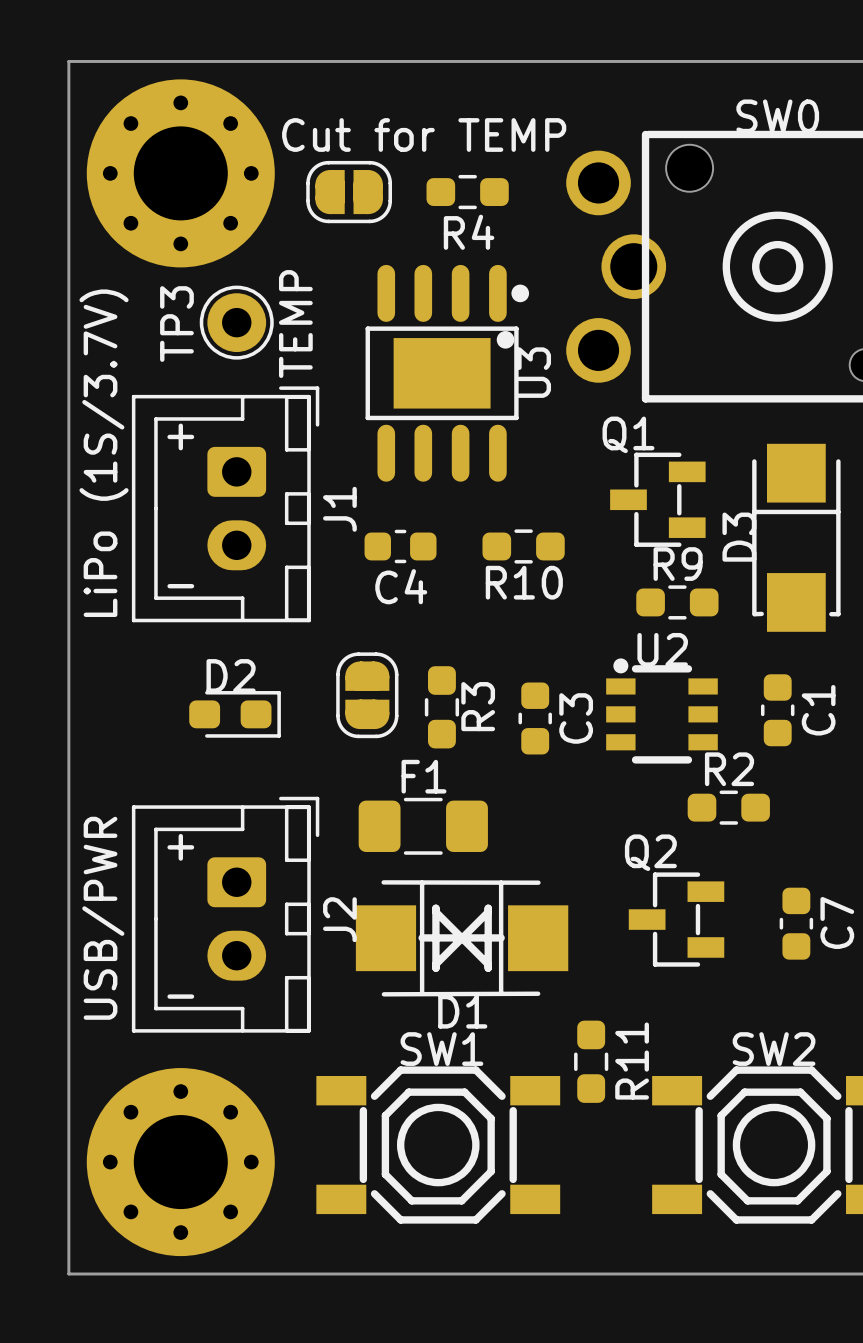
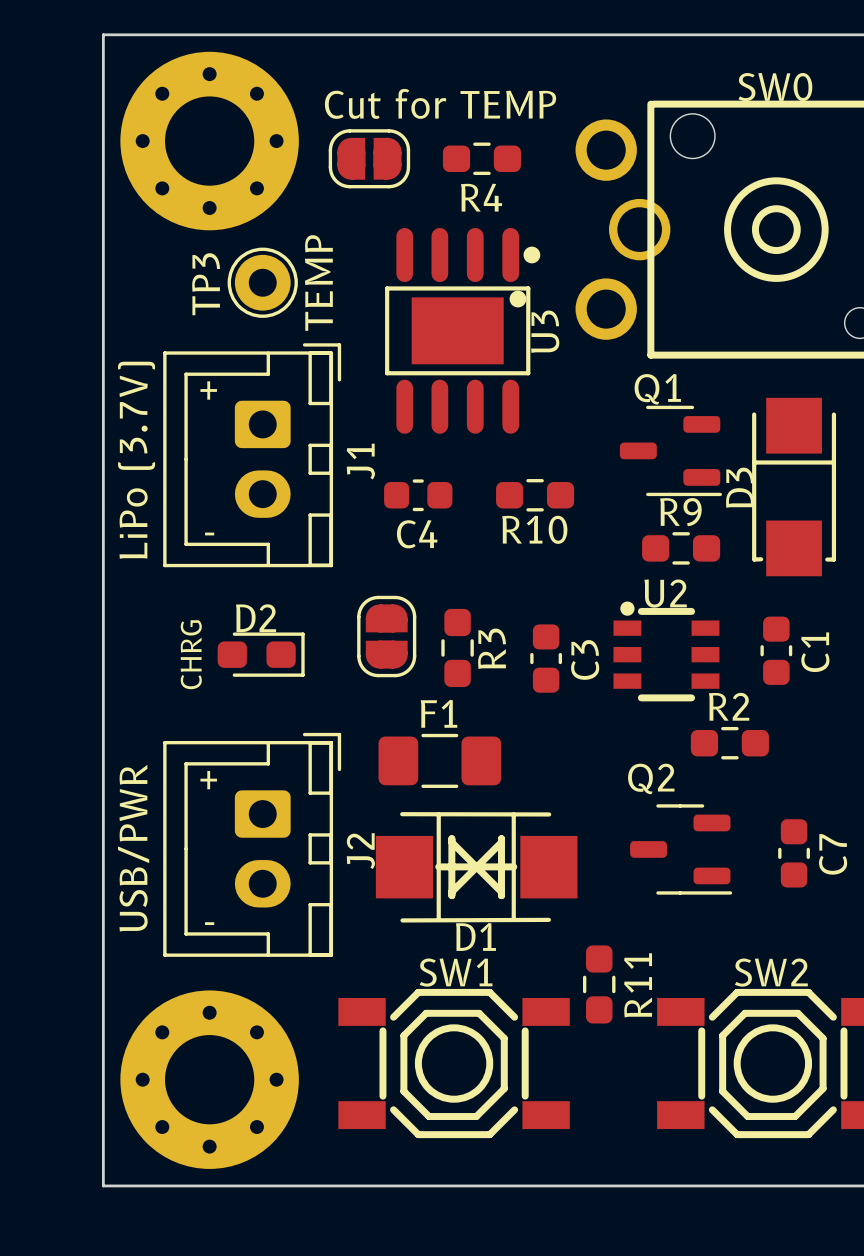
Q1 footprint: [610, 452, 706, 547] -> [619, 405, 722, 497]
J1 value: LiPo (1S/3.7V) (104, 453) -> LiPo (3.7V) (136, 460)
text: none -> CHRG (191, 654)
Q2 footprint: [628, 872, 725, 967] -> [630, 804, 733, 895]

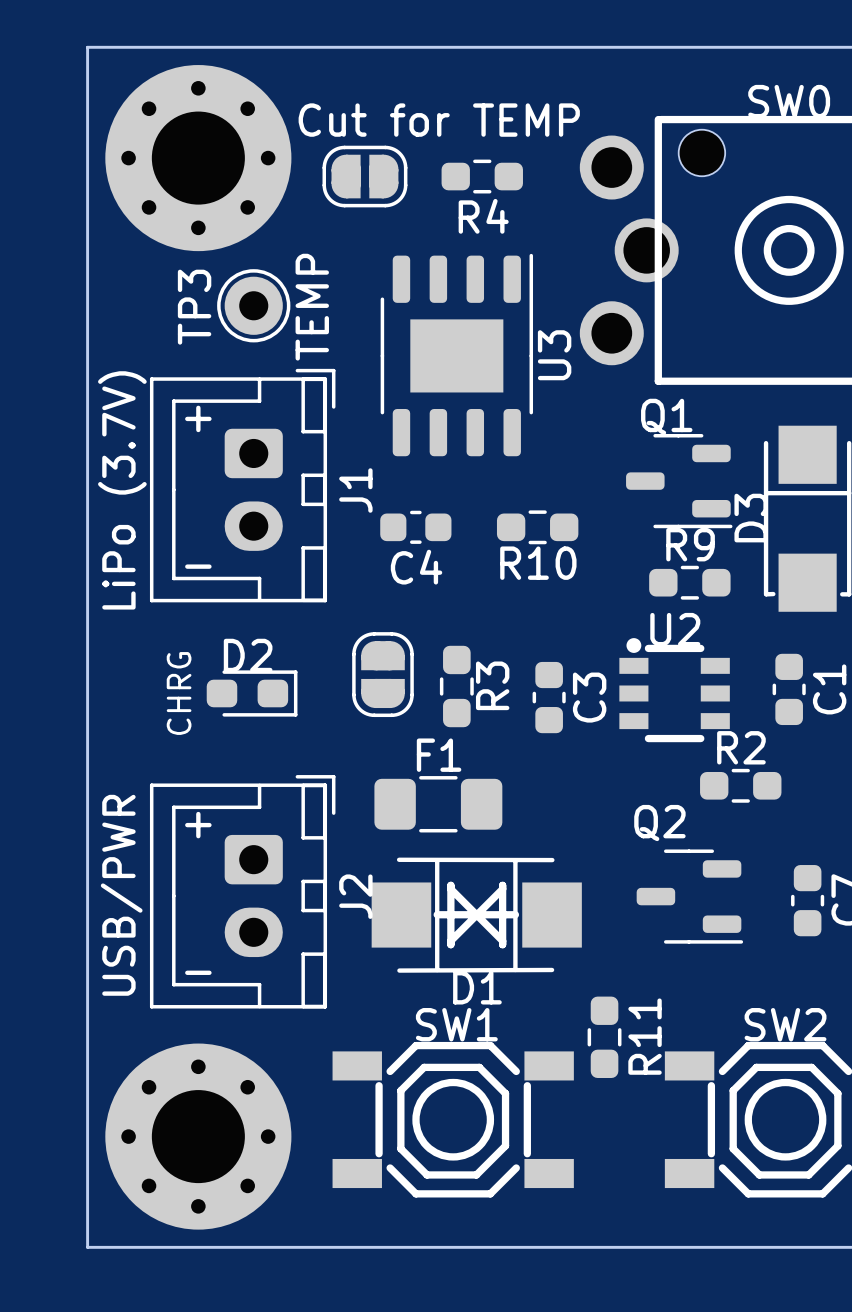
U3 footprint: [385, 227, 541, 434] -> [380, 253, 534, 457]

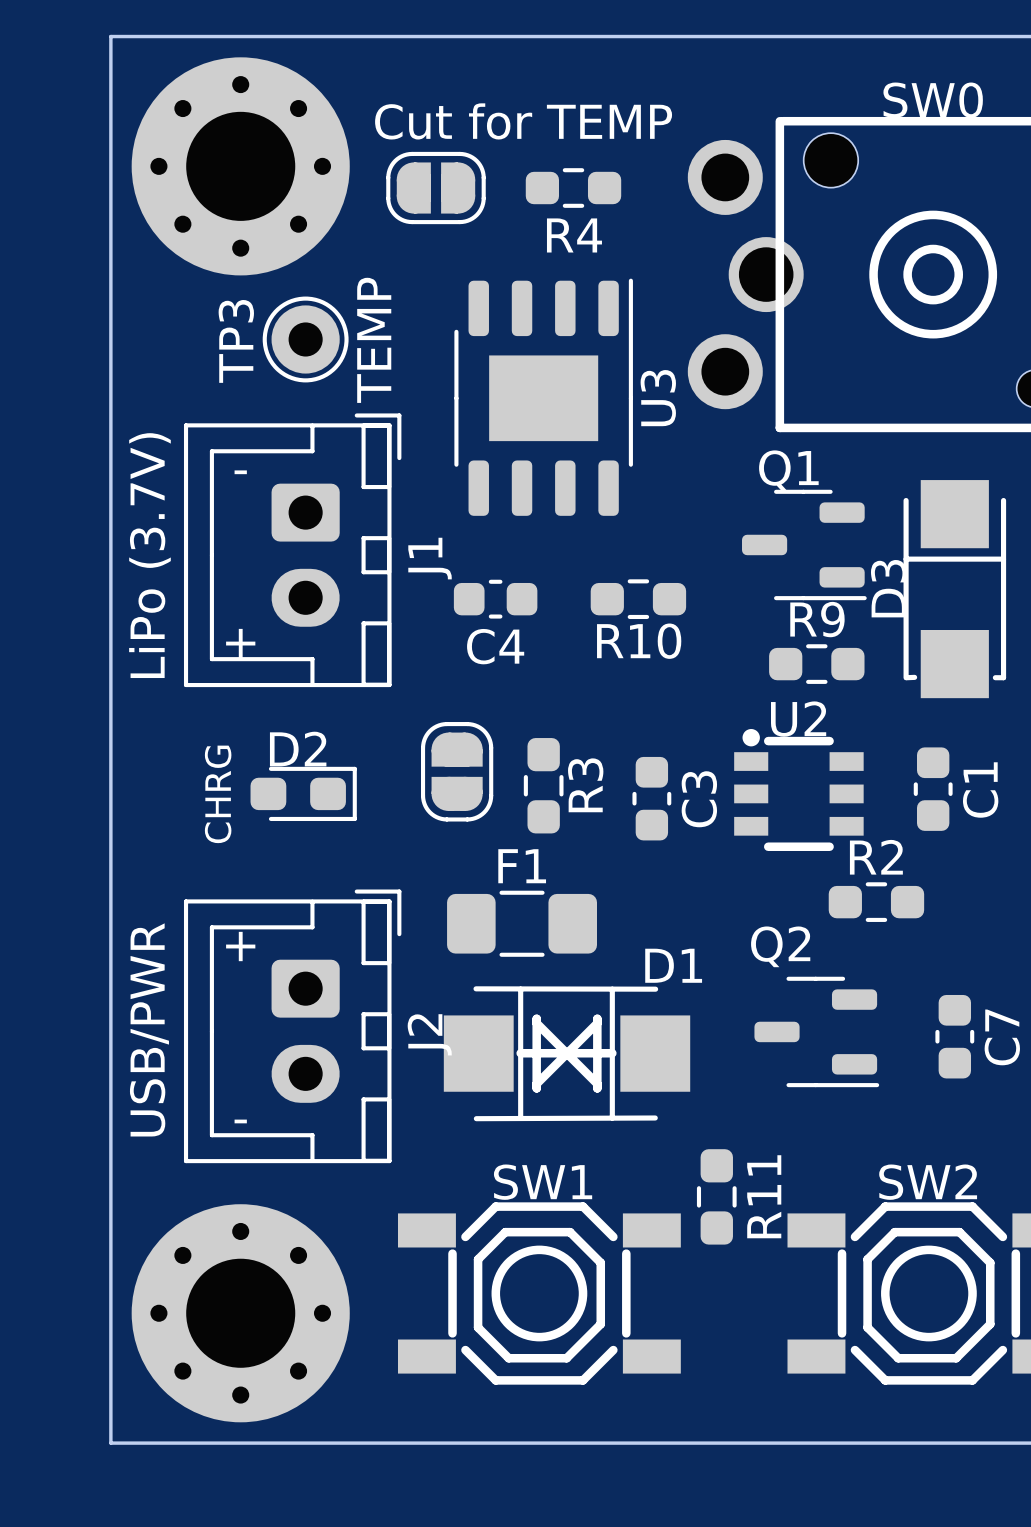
text: + (198, 418) -> - (240, 472)
text: - (198, 566) -> + (240, 643)
D1 name position: D1 (477, 987) -> D1 (673, 965)

